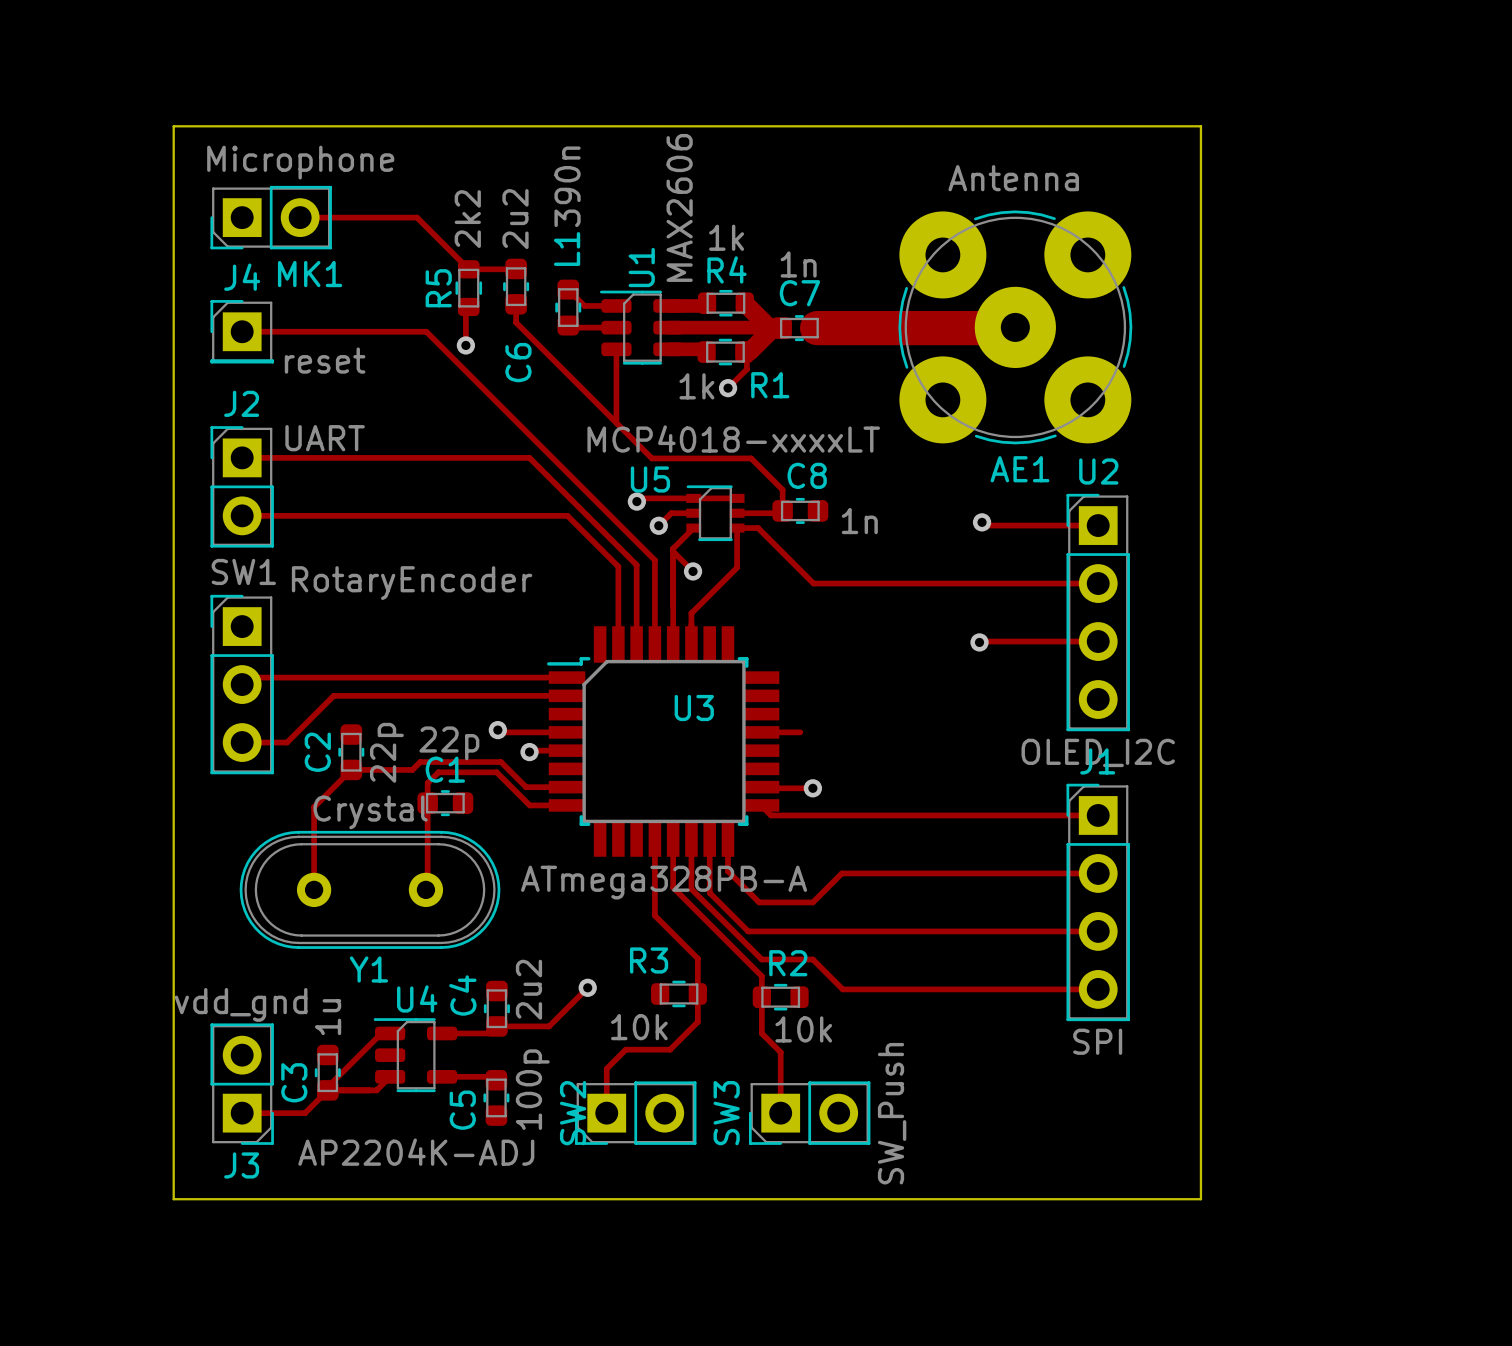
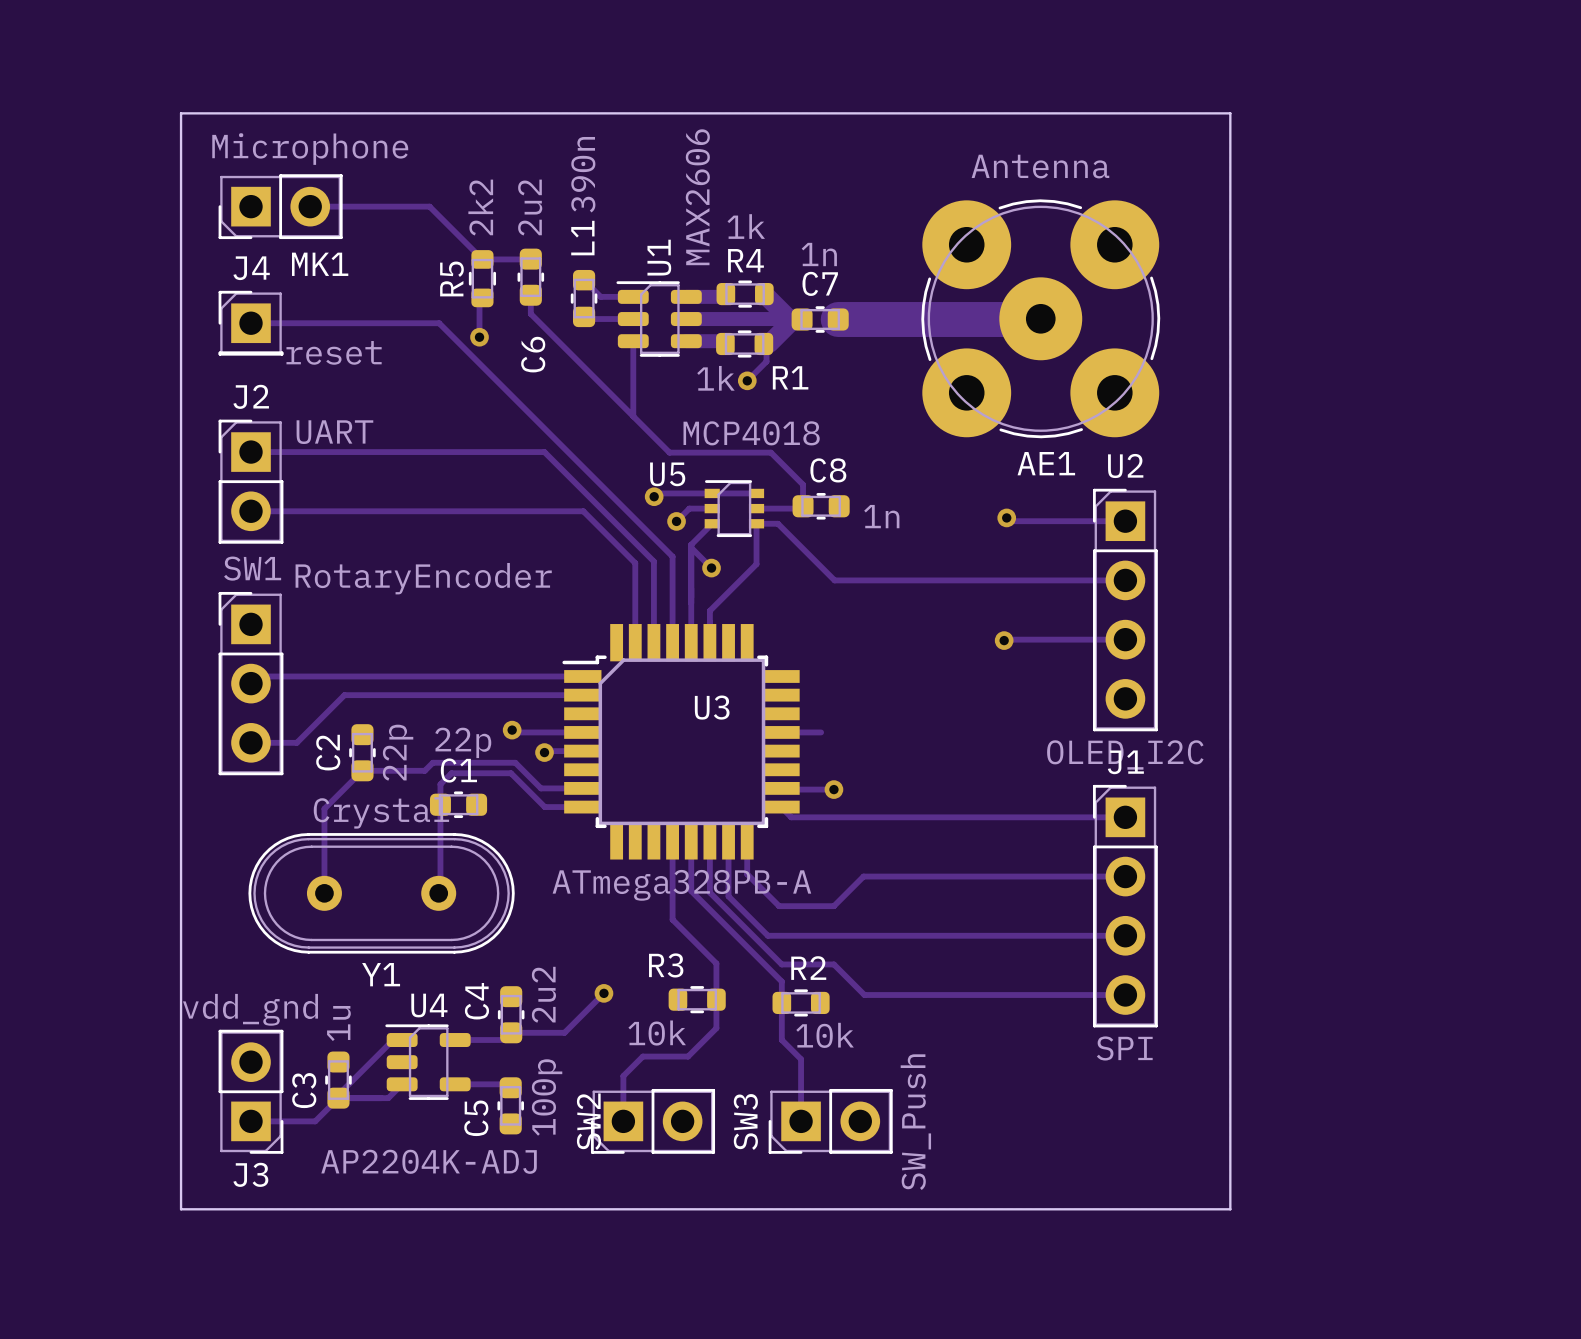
U5 value: MCP4018-xxxxLT (733, 439) -> MCP4018 (751, 433)

